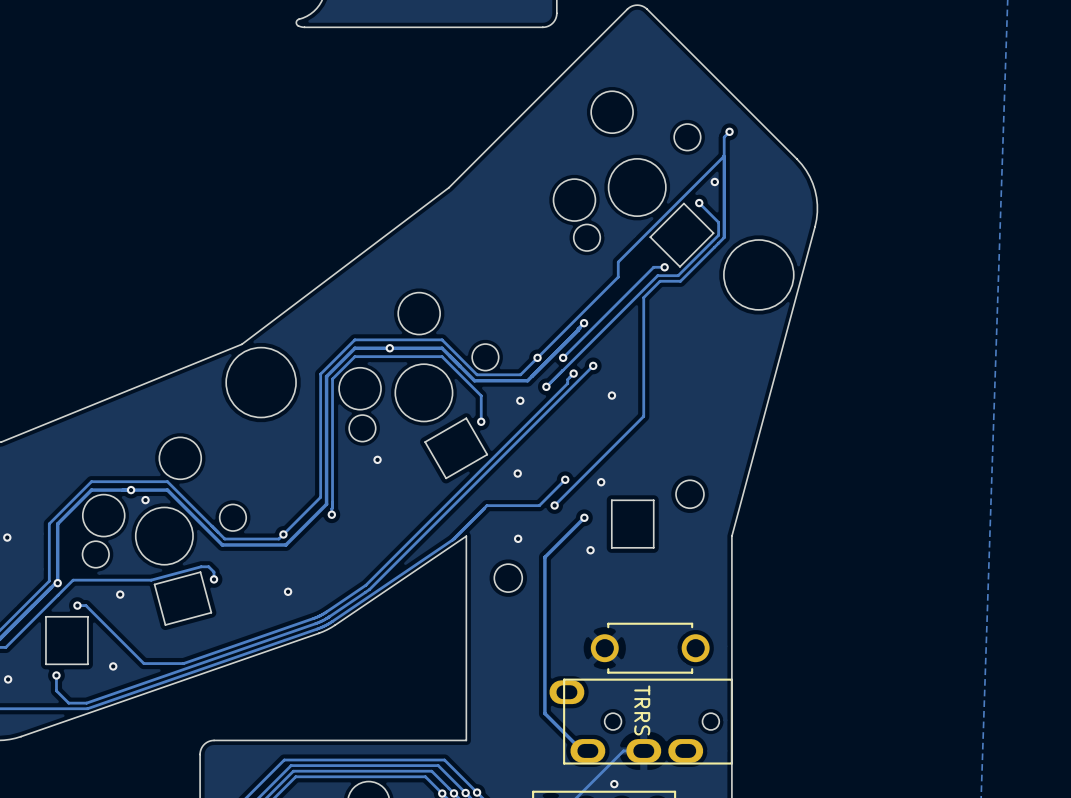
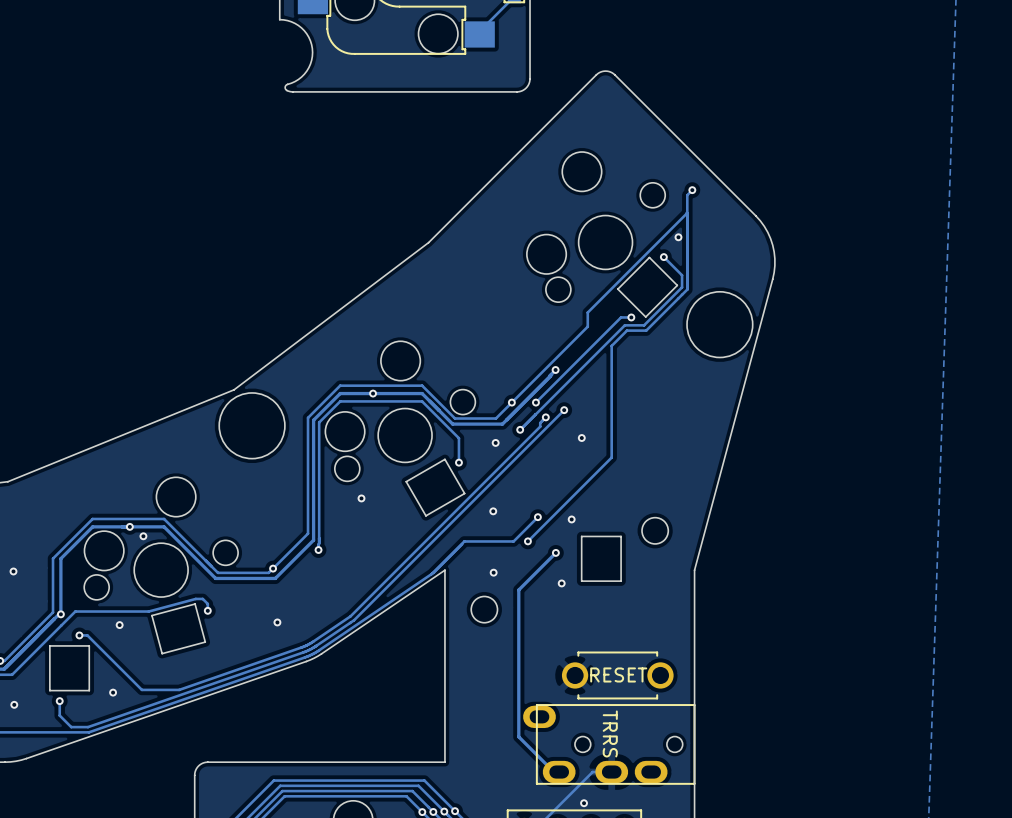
part text: none -> RESET (618, 674)

